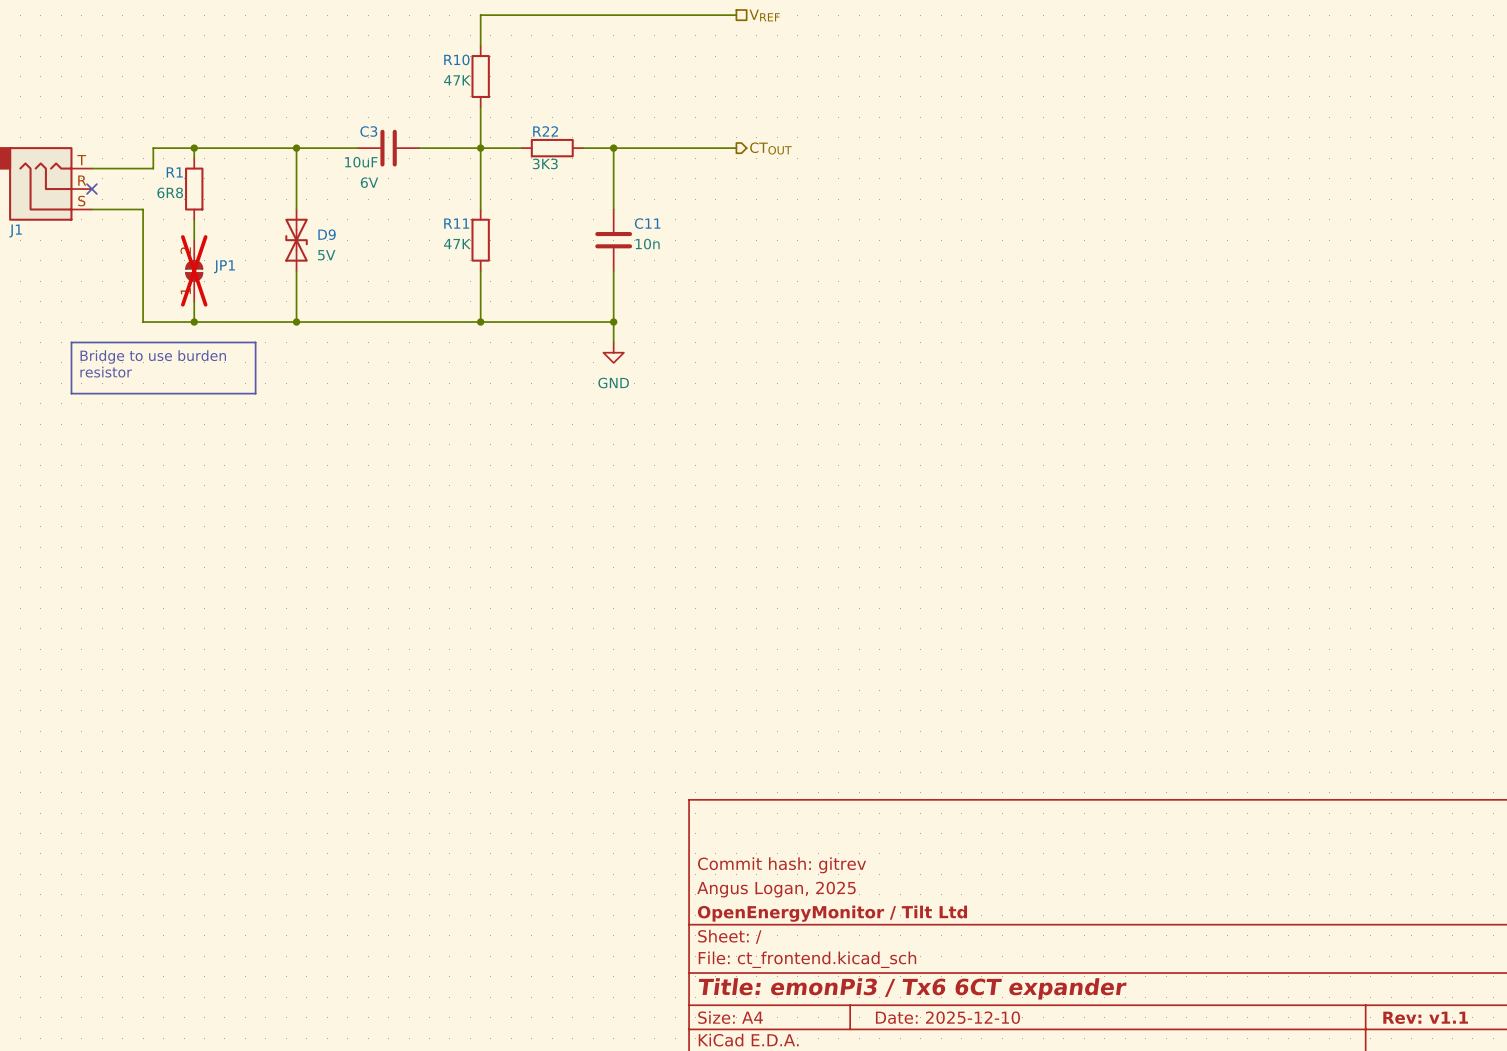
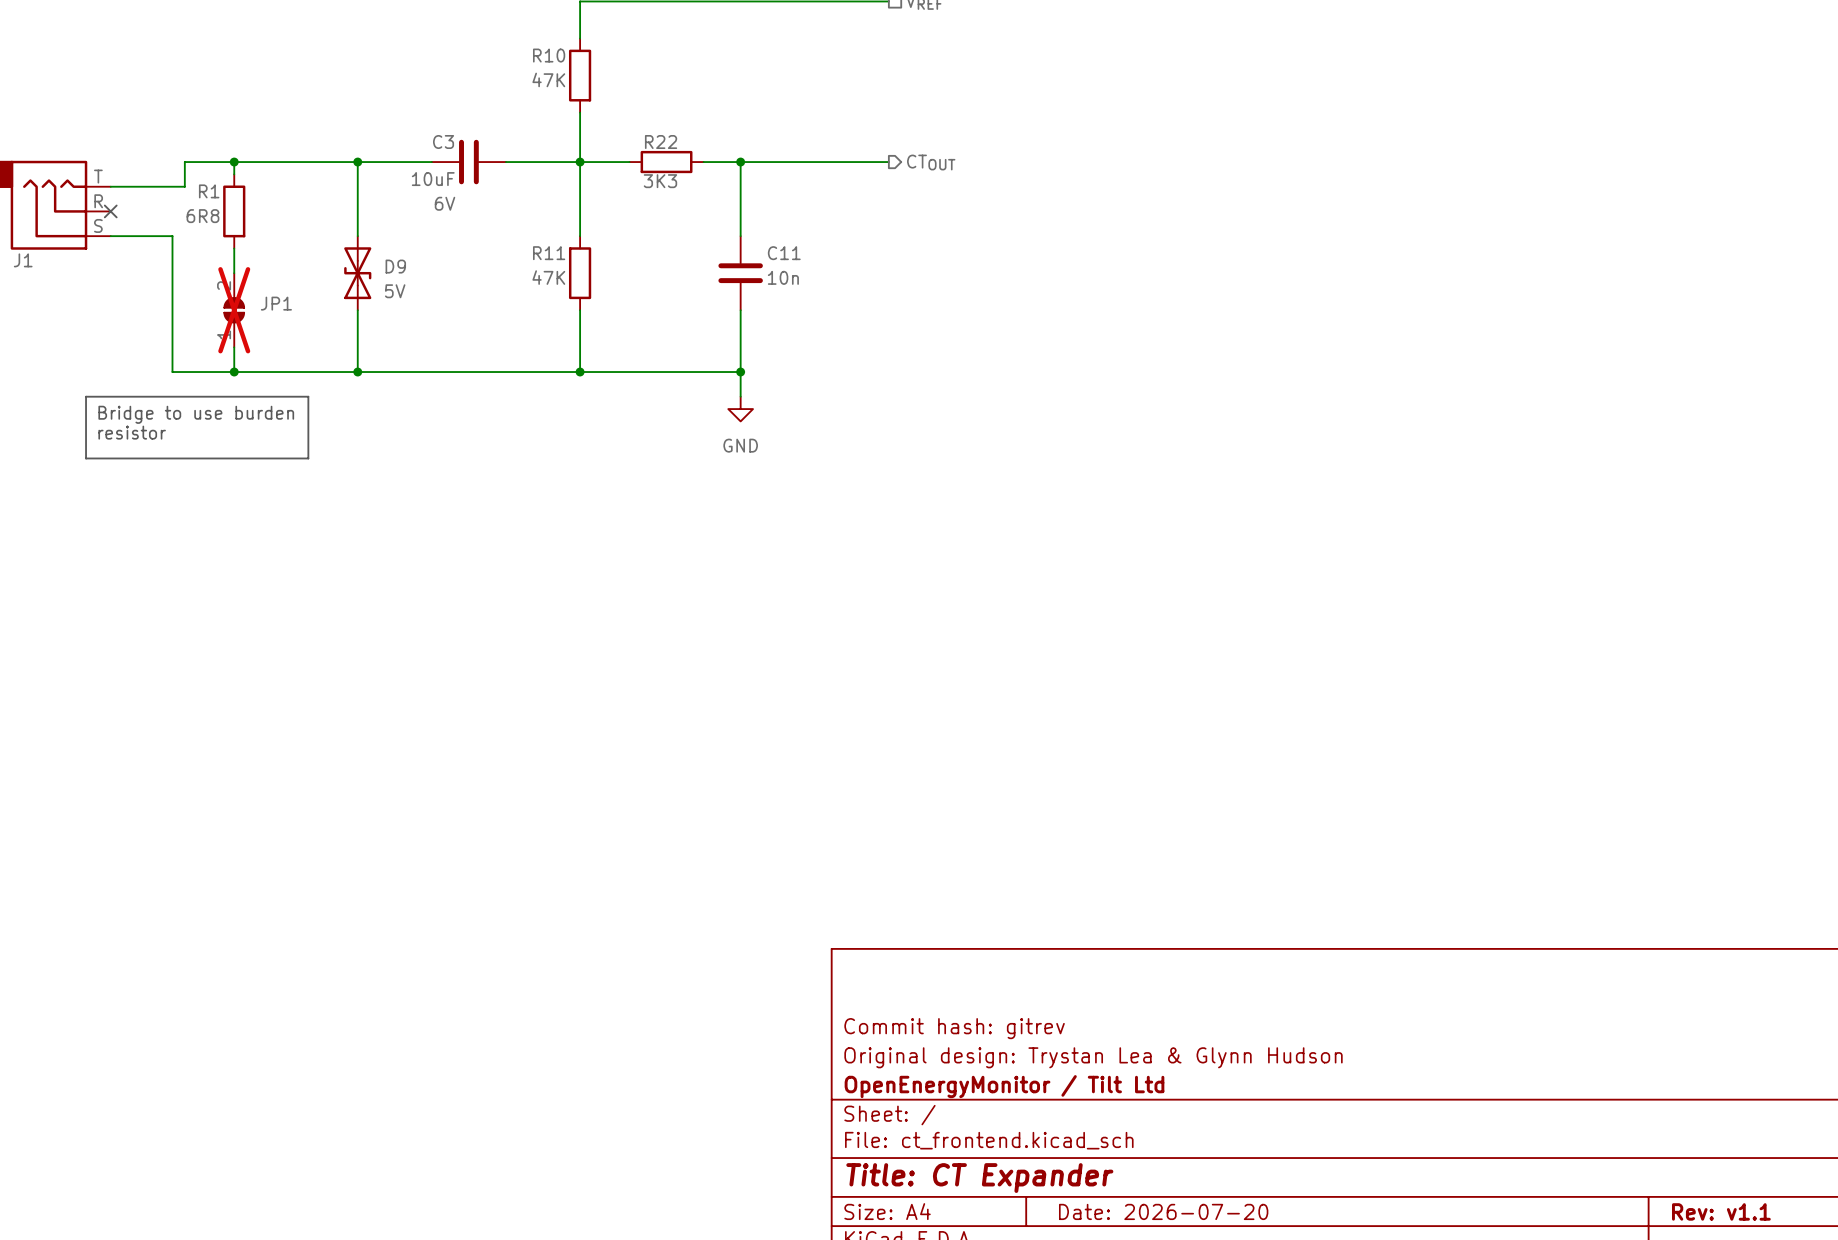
title block: Angus Logan, 2025 (776, 889) -> Original design: Trystan Lea & Glynn Hudson (1093, 1057)
title block: Title: emonPi3 / Tx6 6CT expander (912, 988) -> Title: CT Expander (979, 1178)
title block: Date: 2025-12-10 (947, 1017) -> Date: 2026-07-20 (1163, 1211)

